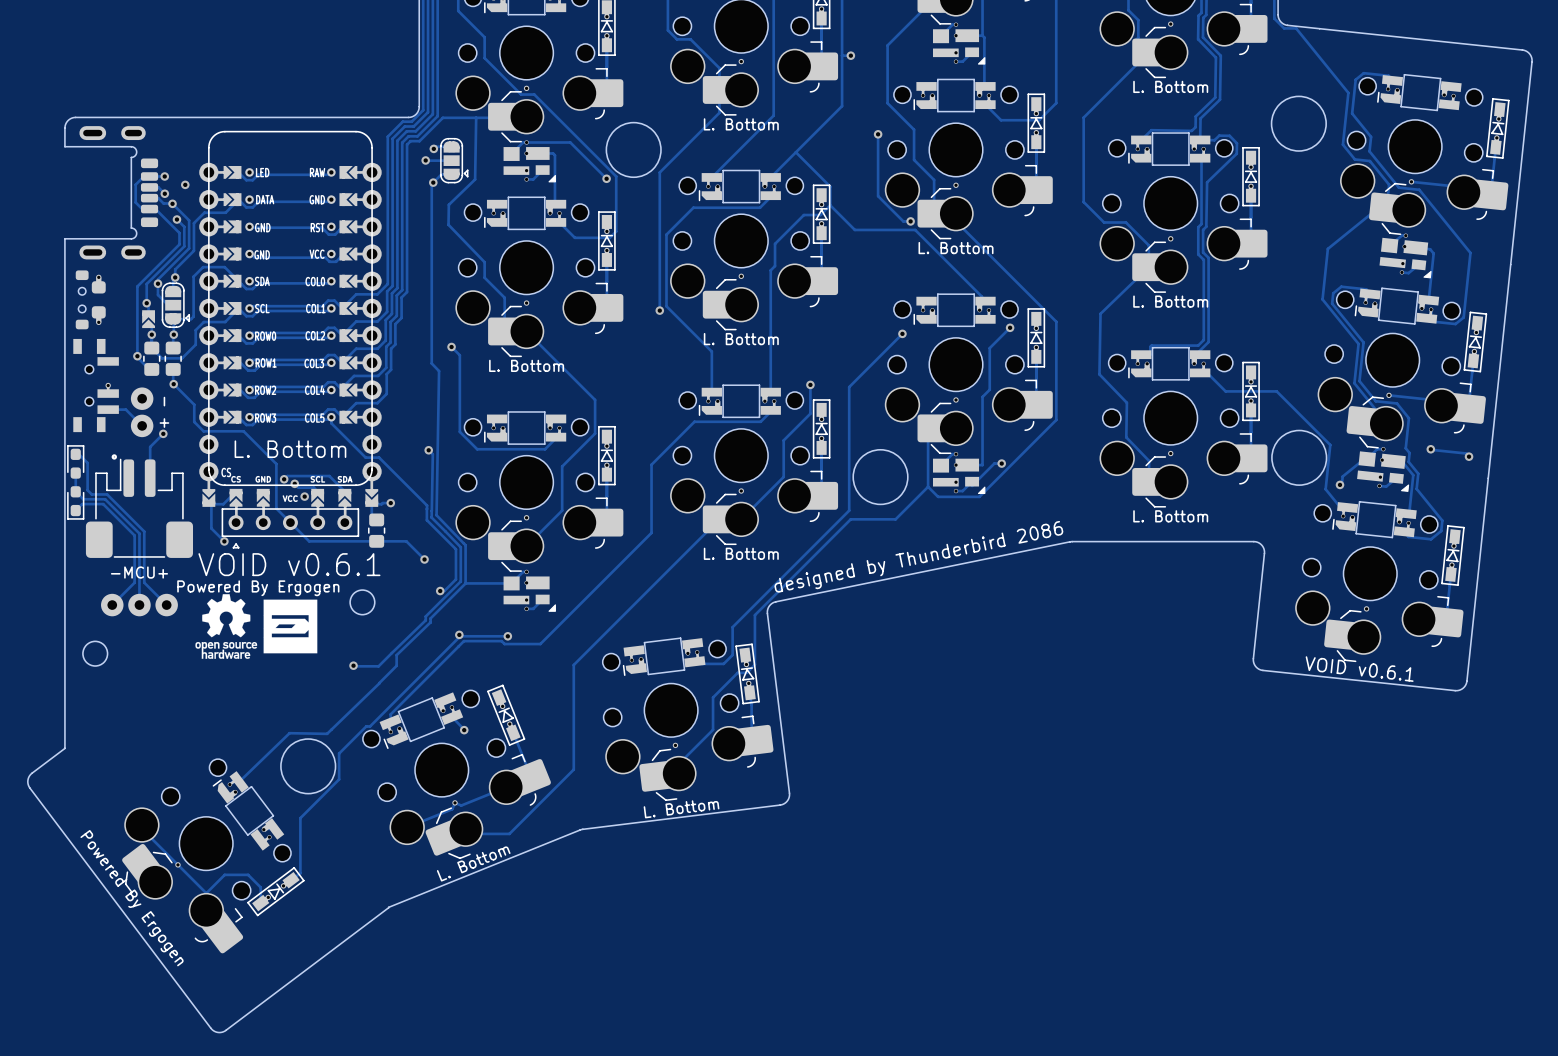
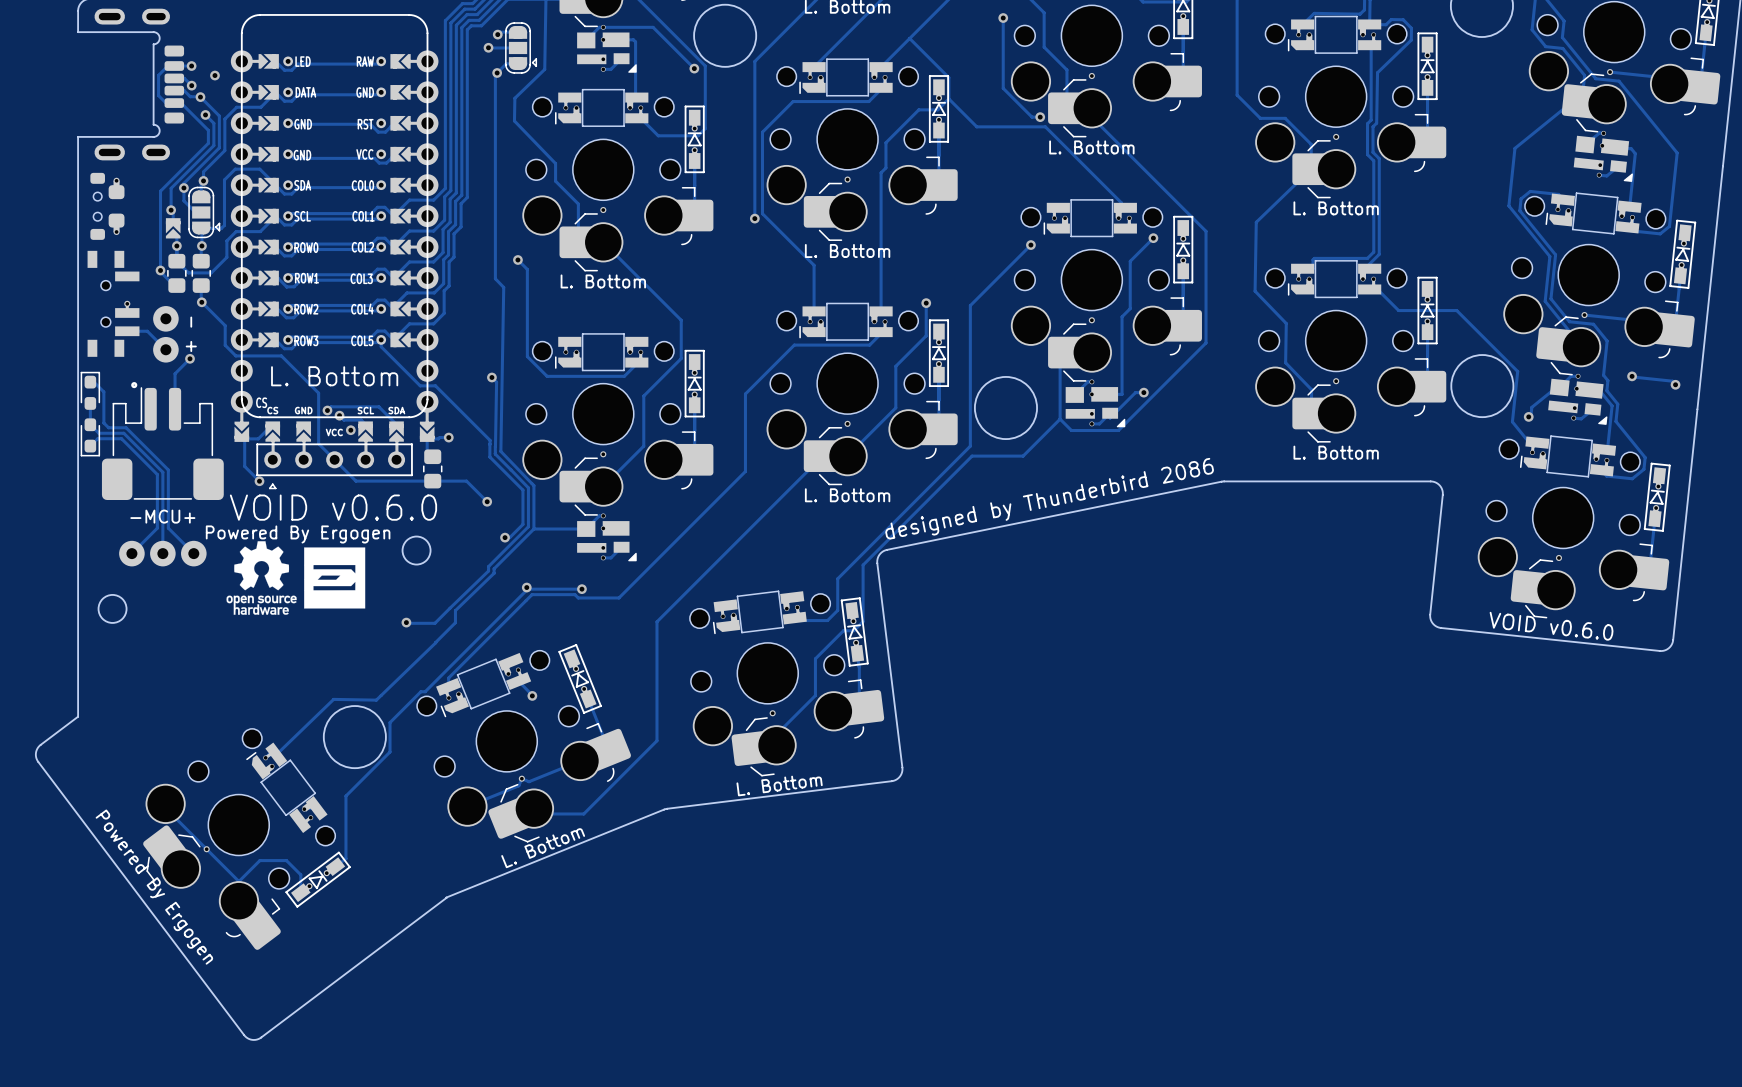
text: VOID v0.6.1 (289, 564) -> VOID v0.6.0 (333, 507)
text: VOID v0.6.1 (1359, 669) -> VOID v0.6.0 (1551, 626)

